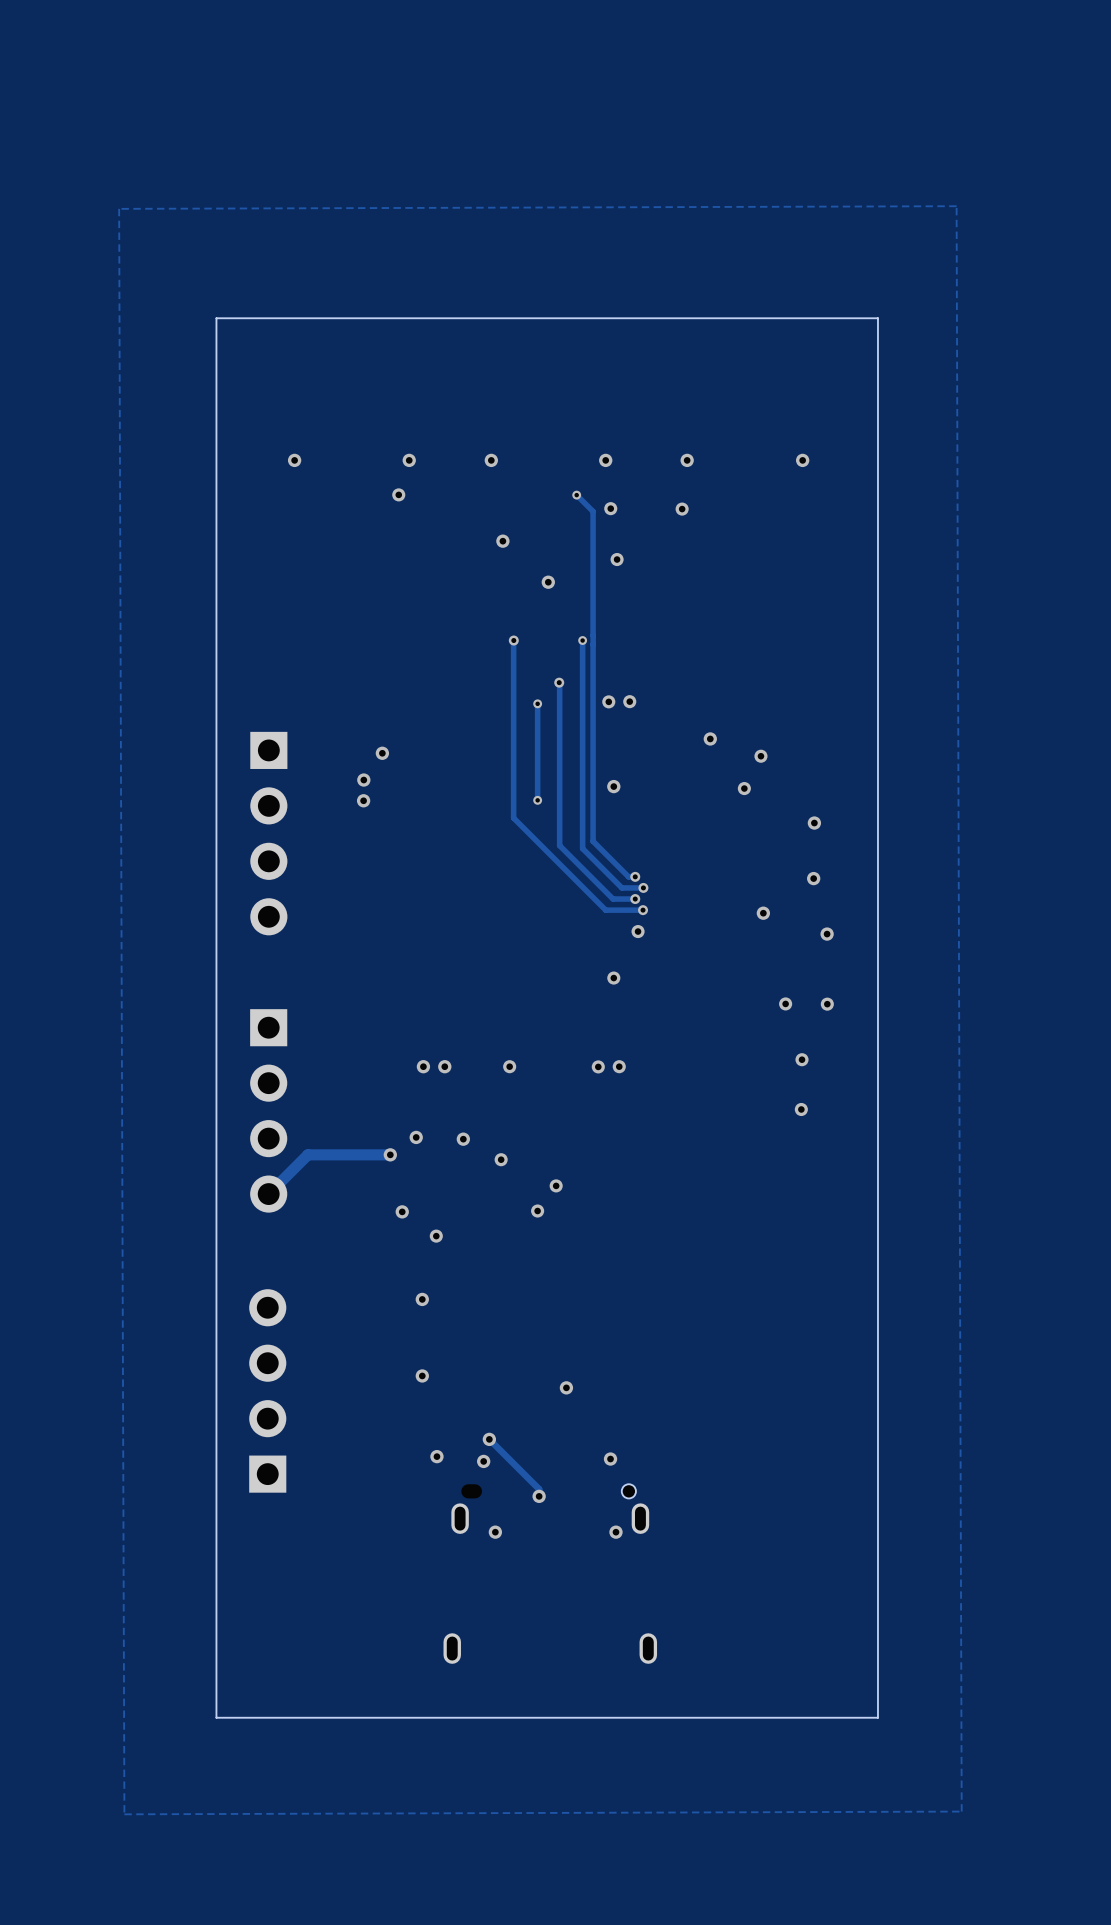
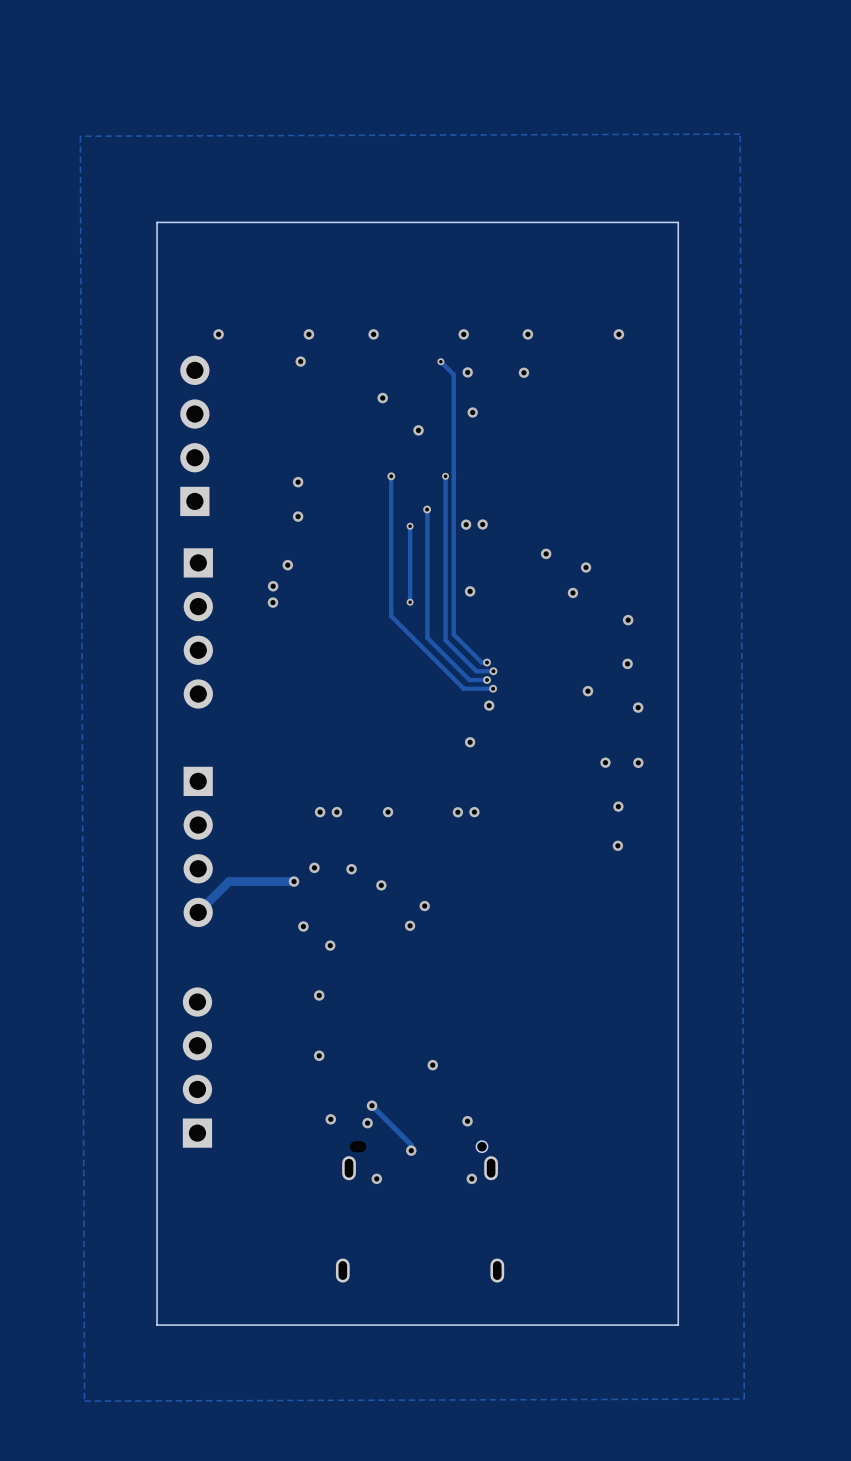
part: none -> (194, 435)
via: none -> (298, 482)
via: none -> (298, 516)

